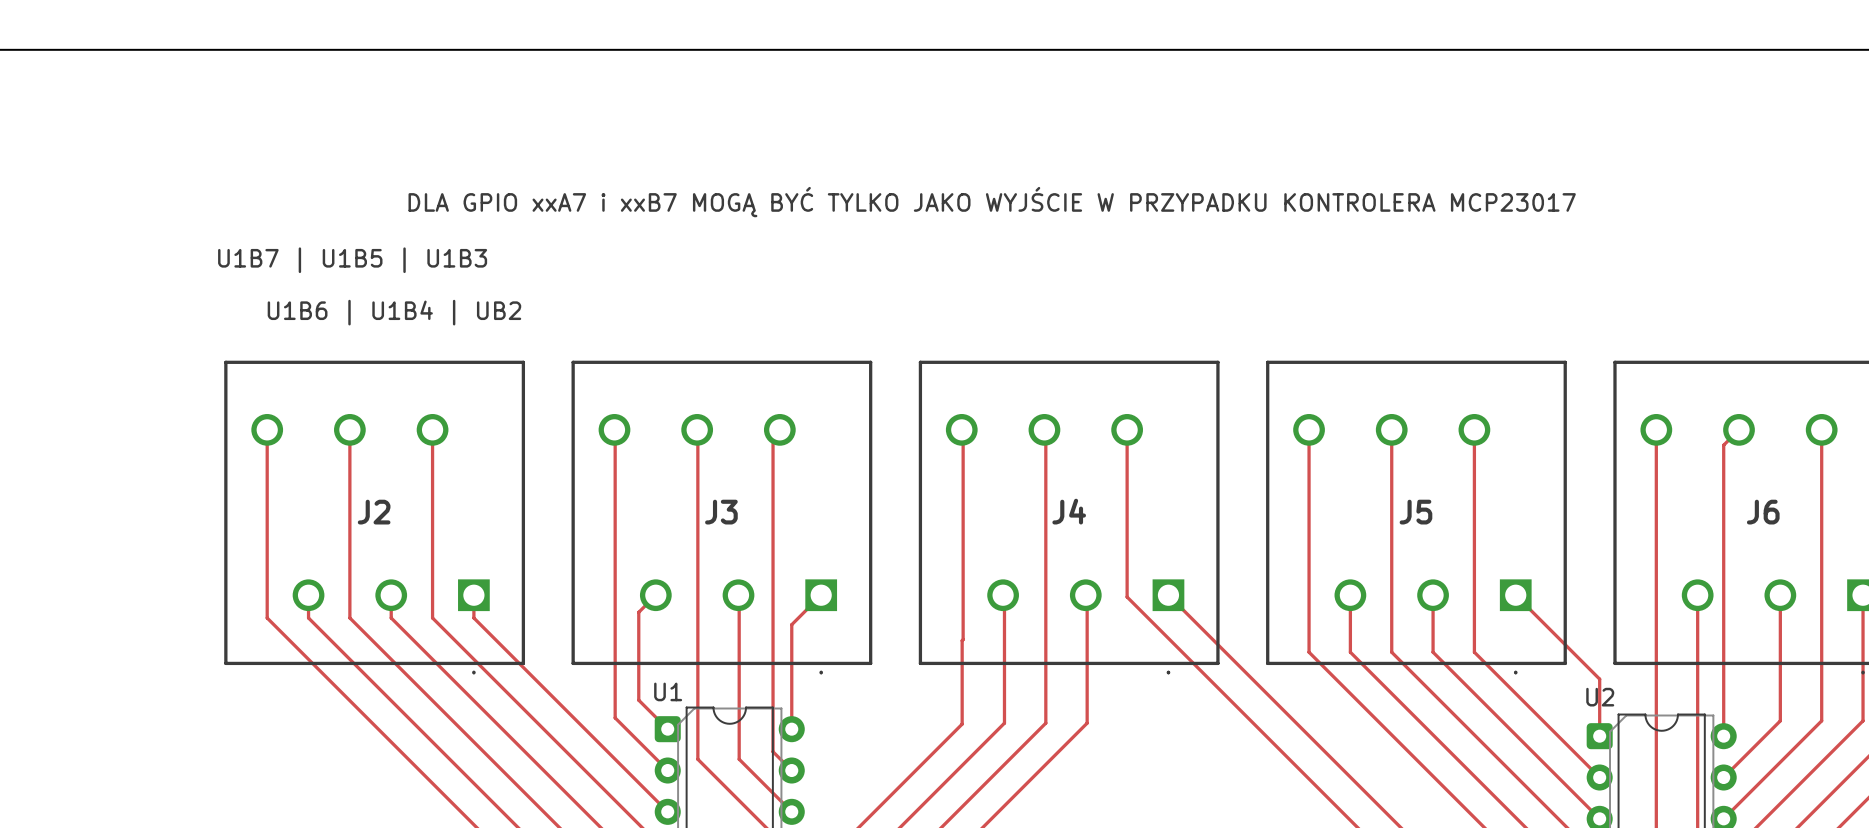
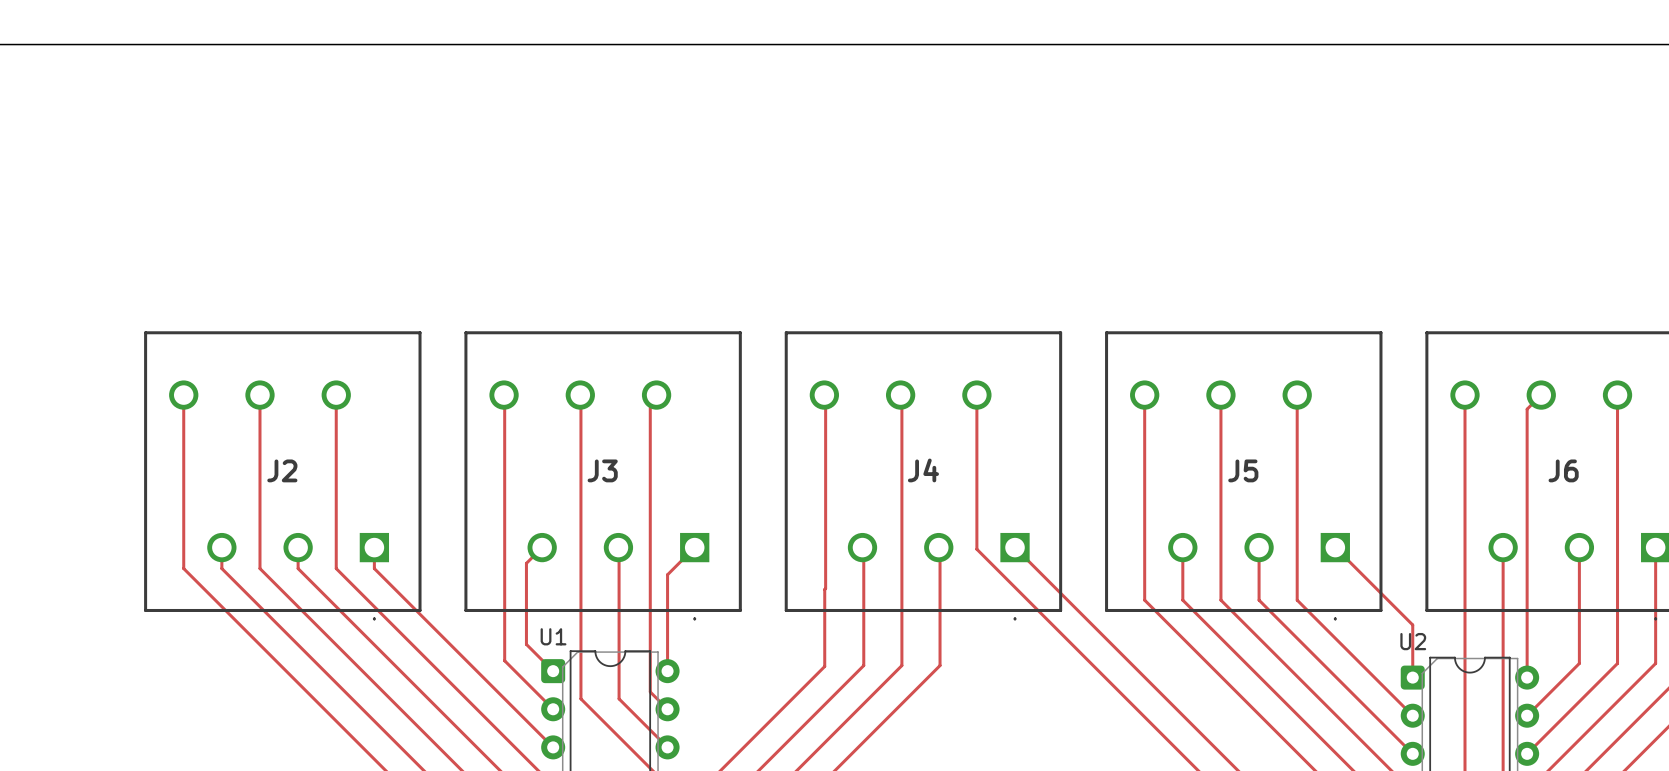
text: DLA GPIO xxA7 i xxB7 MOGĄ BYĆ TYLKO JAKO WYJŚCIE W PRZYPADKU KONTROLERA MCP23017 (992, 202) -> none
text: U1B7 | U1B5 | U1B3 (352, 260) -> none
text: U1B6 | U1B4 | UB2 (394, 312) -> none

